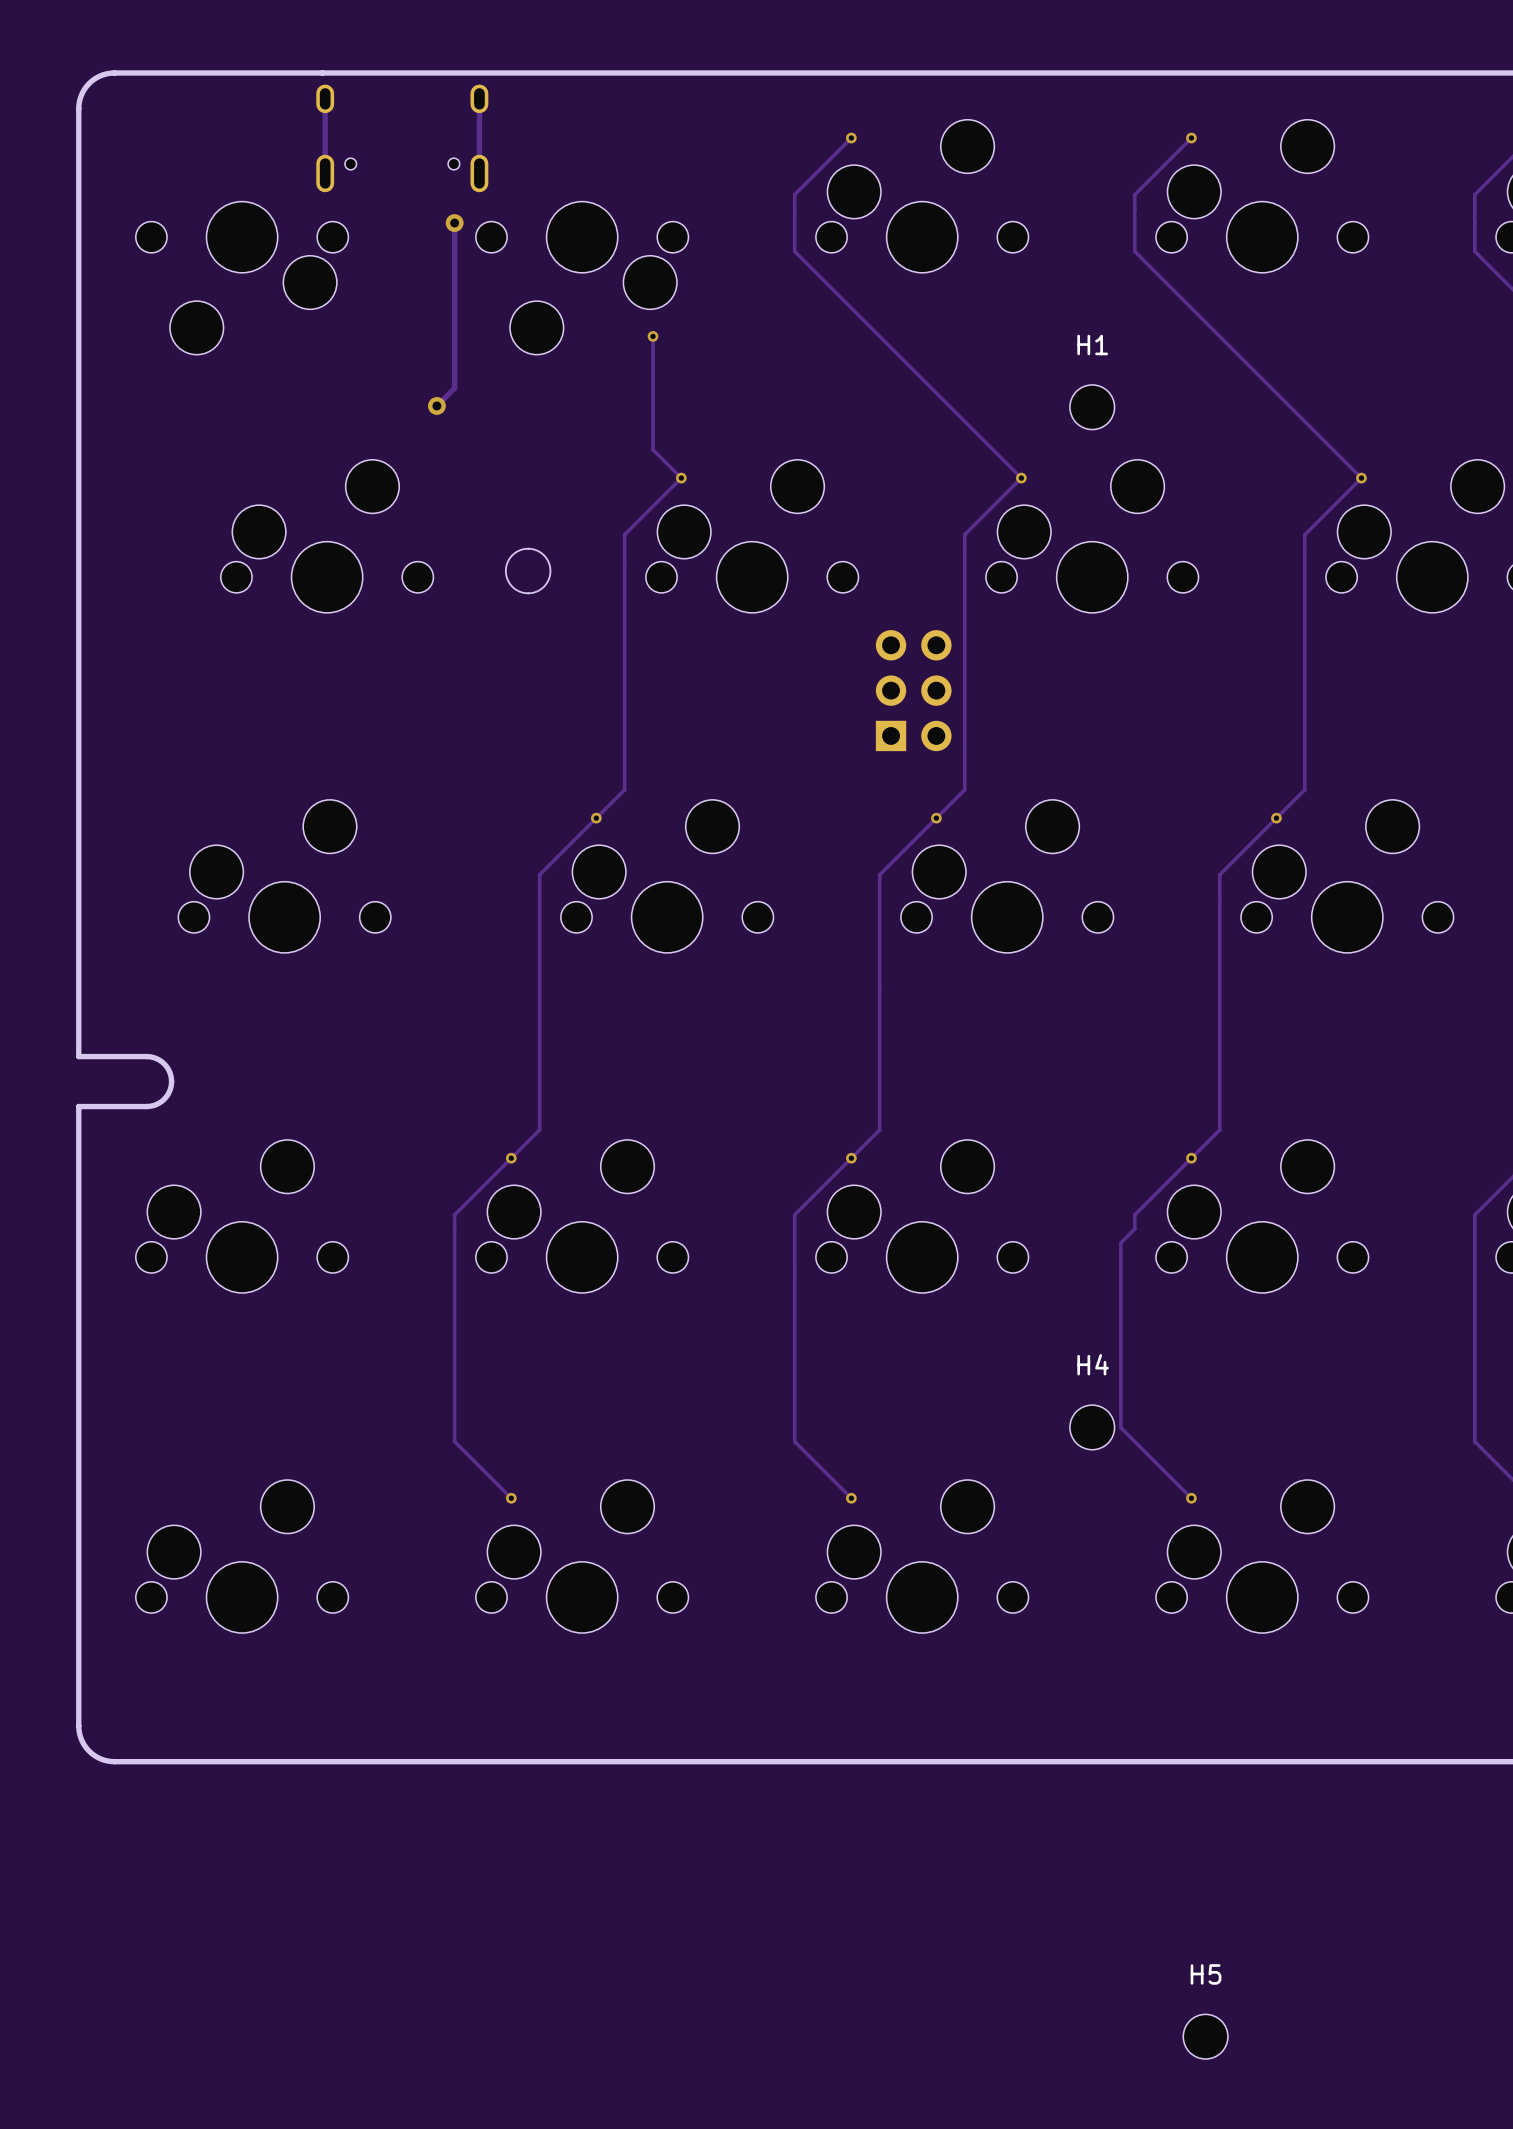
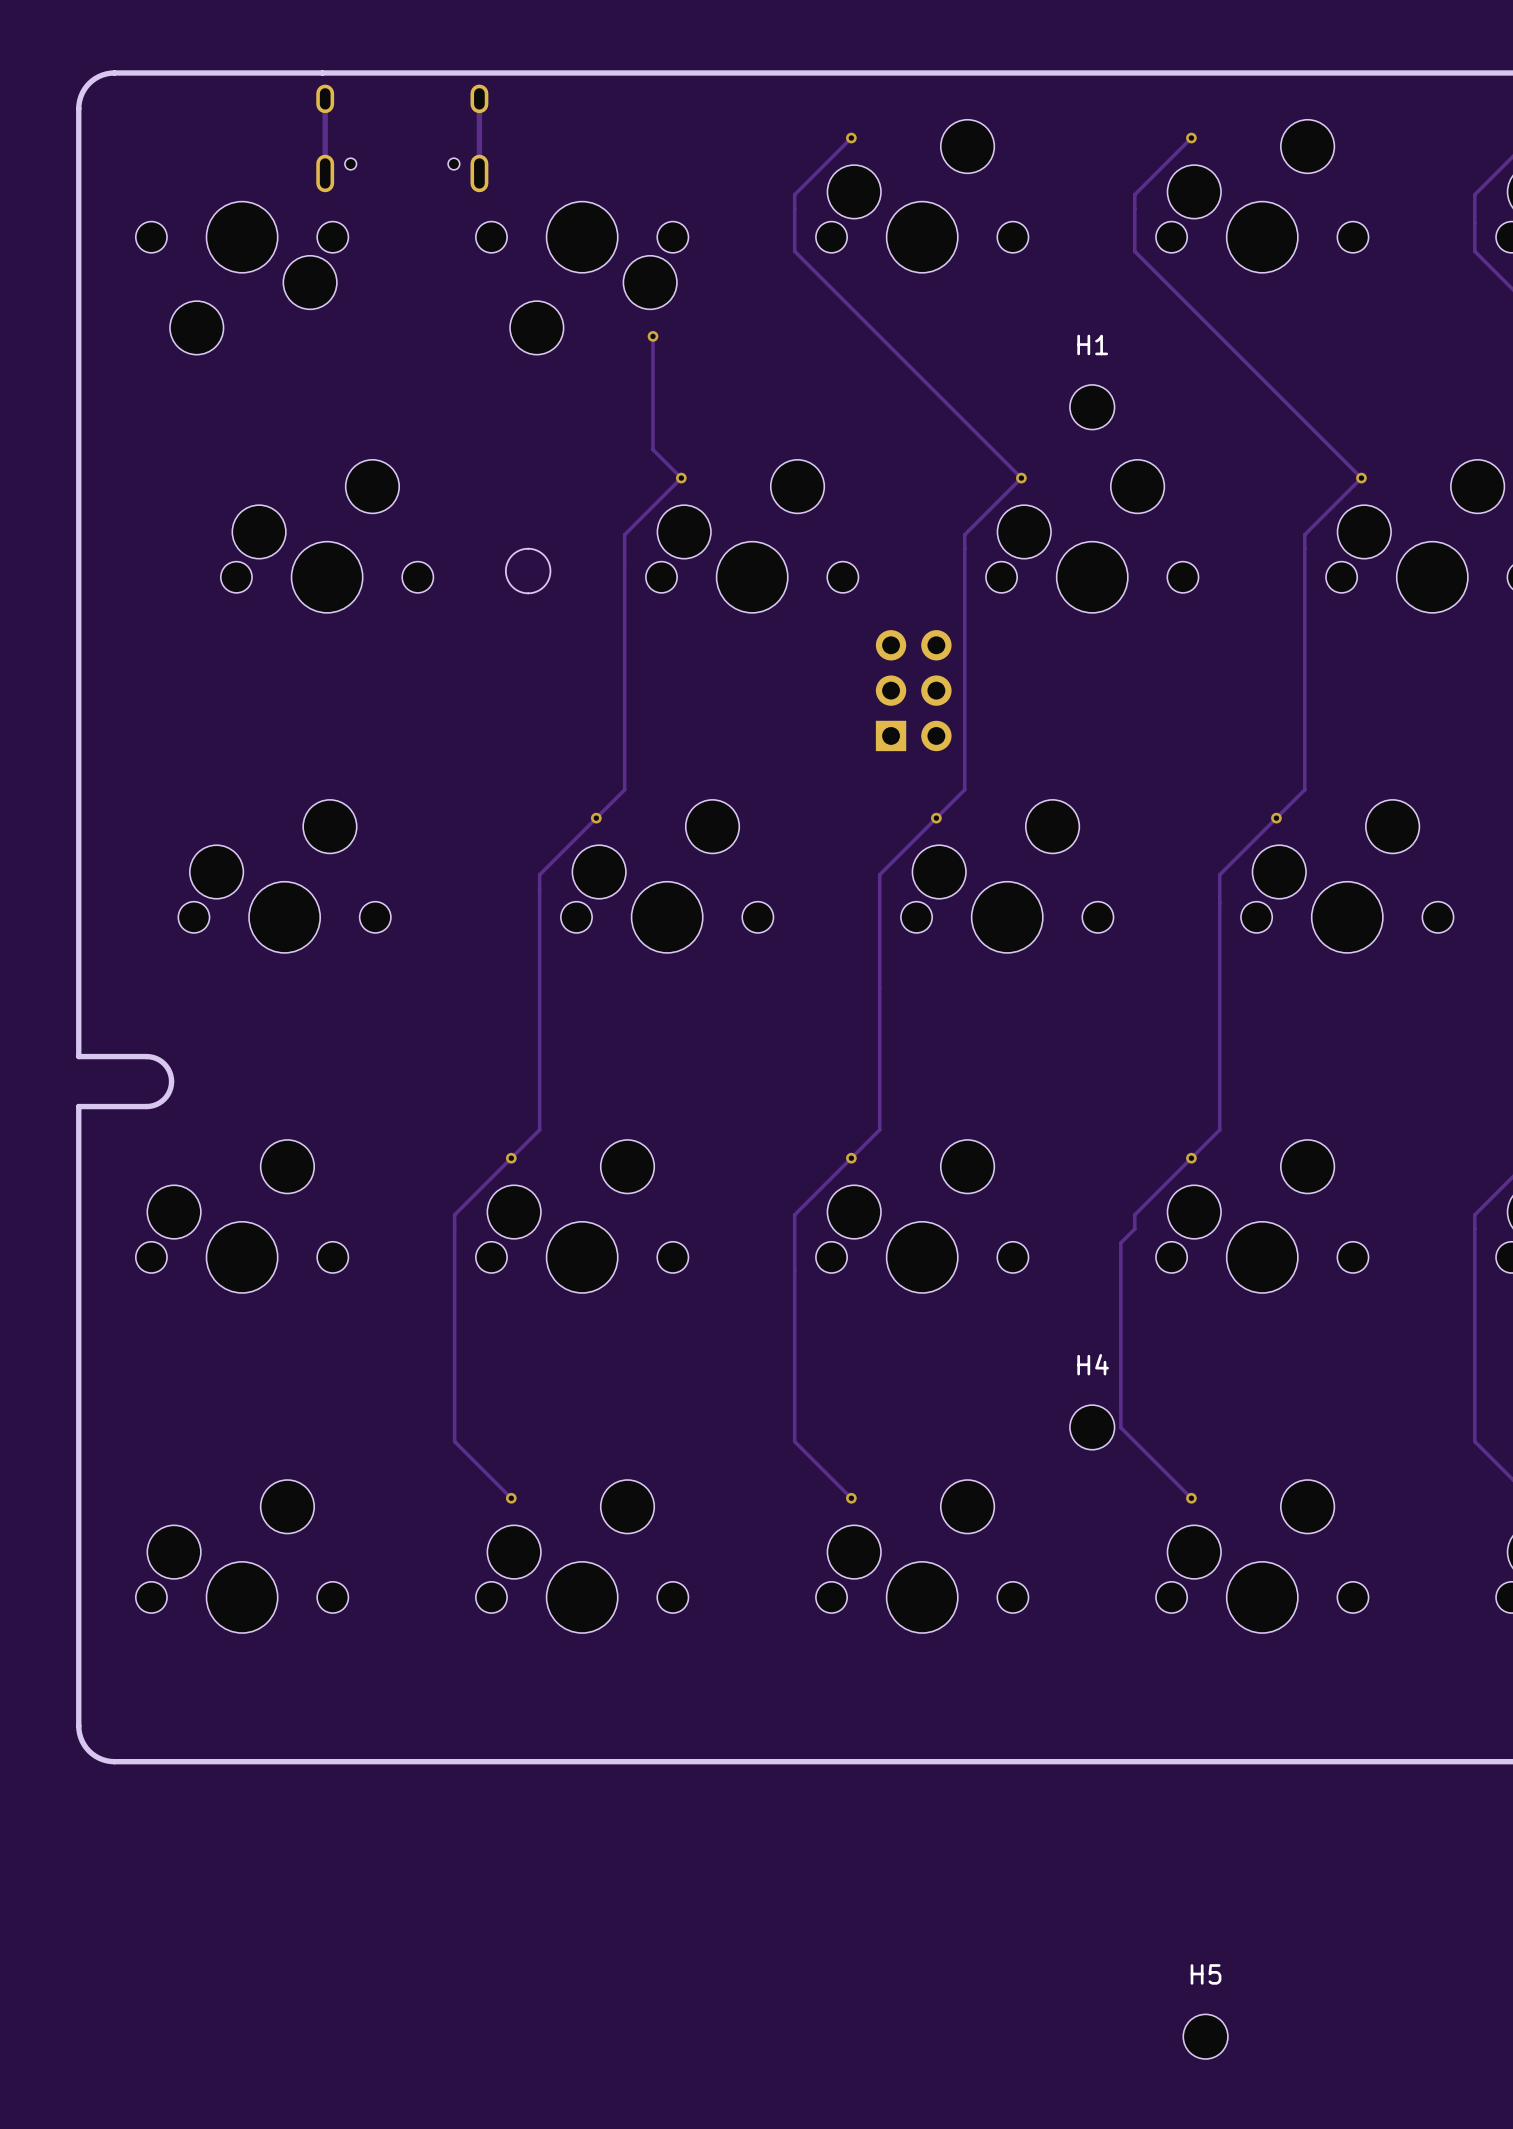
track: (454, 223) (454, 388) (436, 405) -> none
via: (454, 223) -> none
via: (436, 405) -> none

